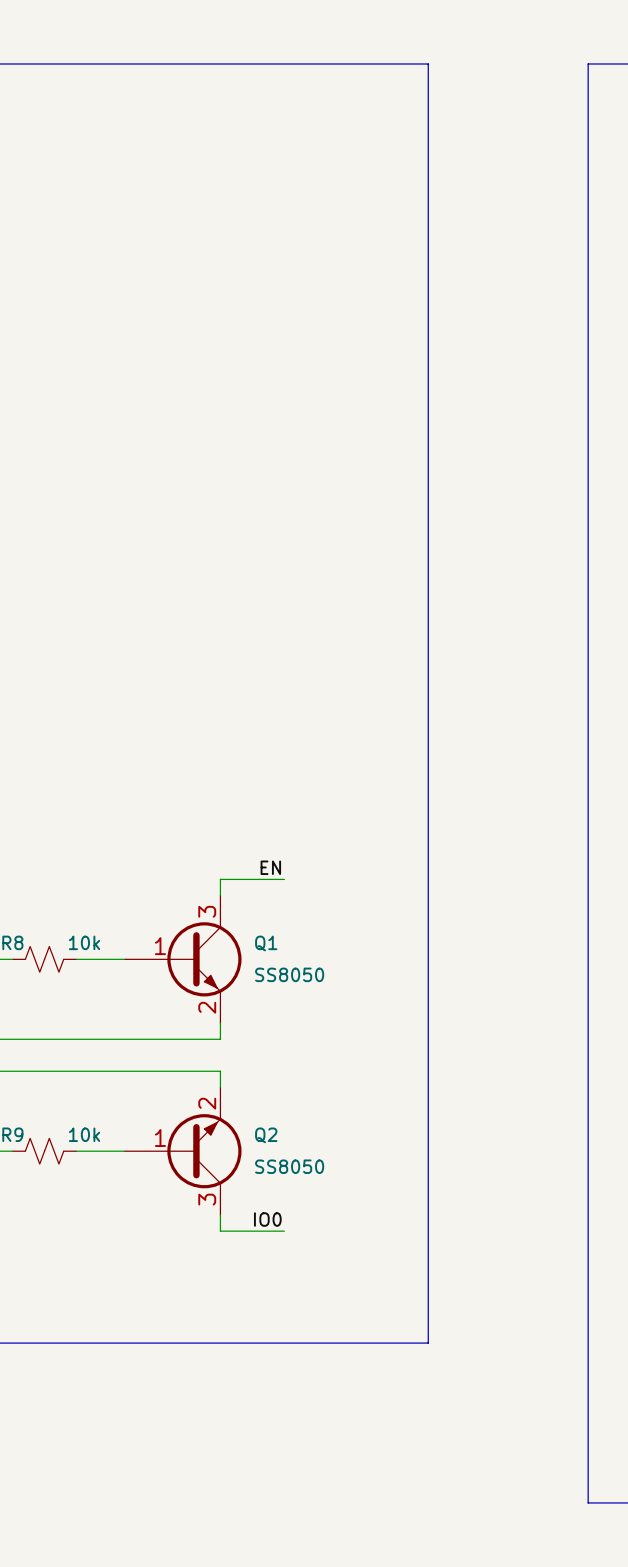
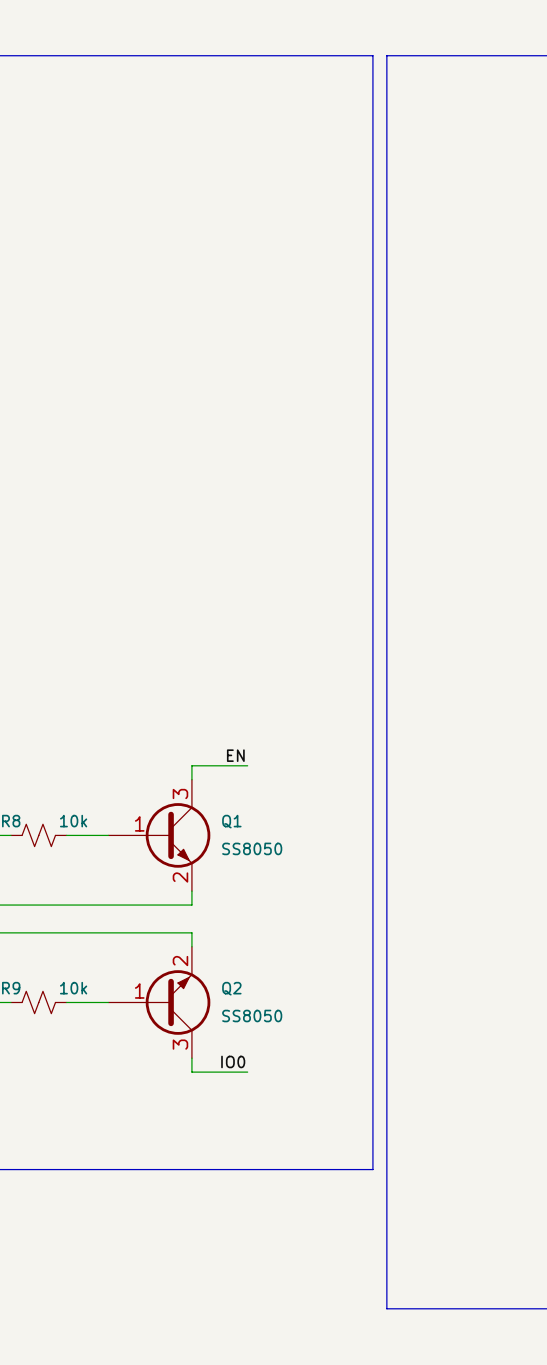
line: (588, 63) (588, 1502) -> (512, 55) (386, 55) (386, 1308) (512, 1308)

